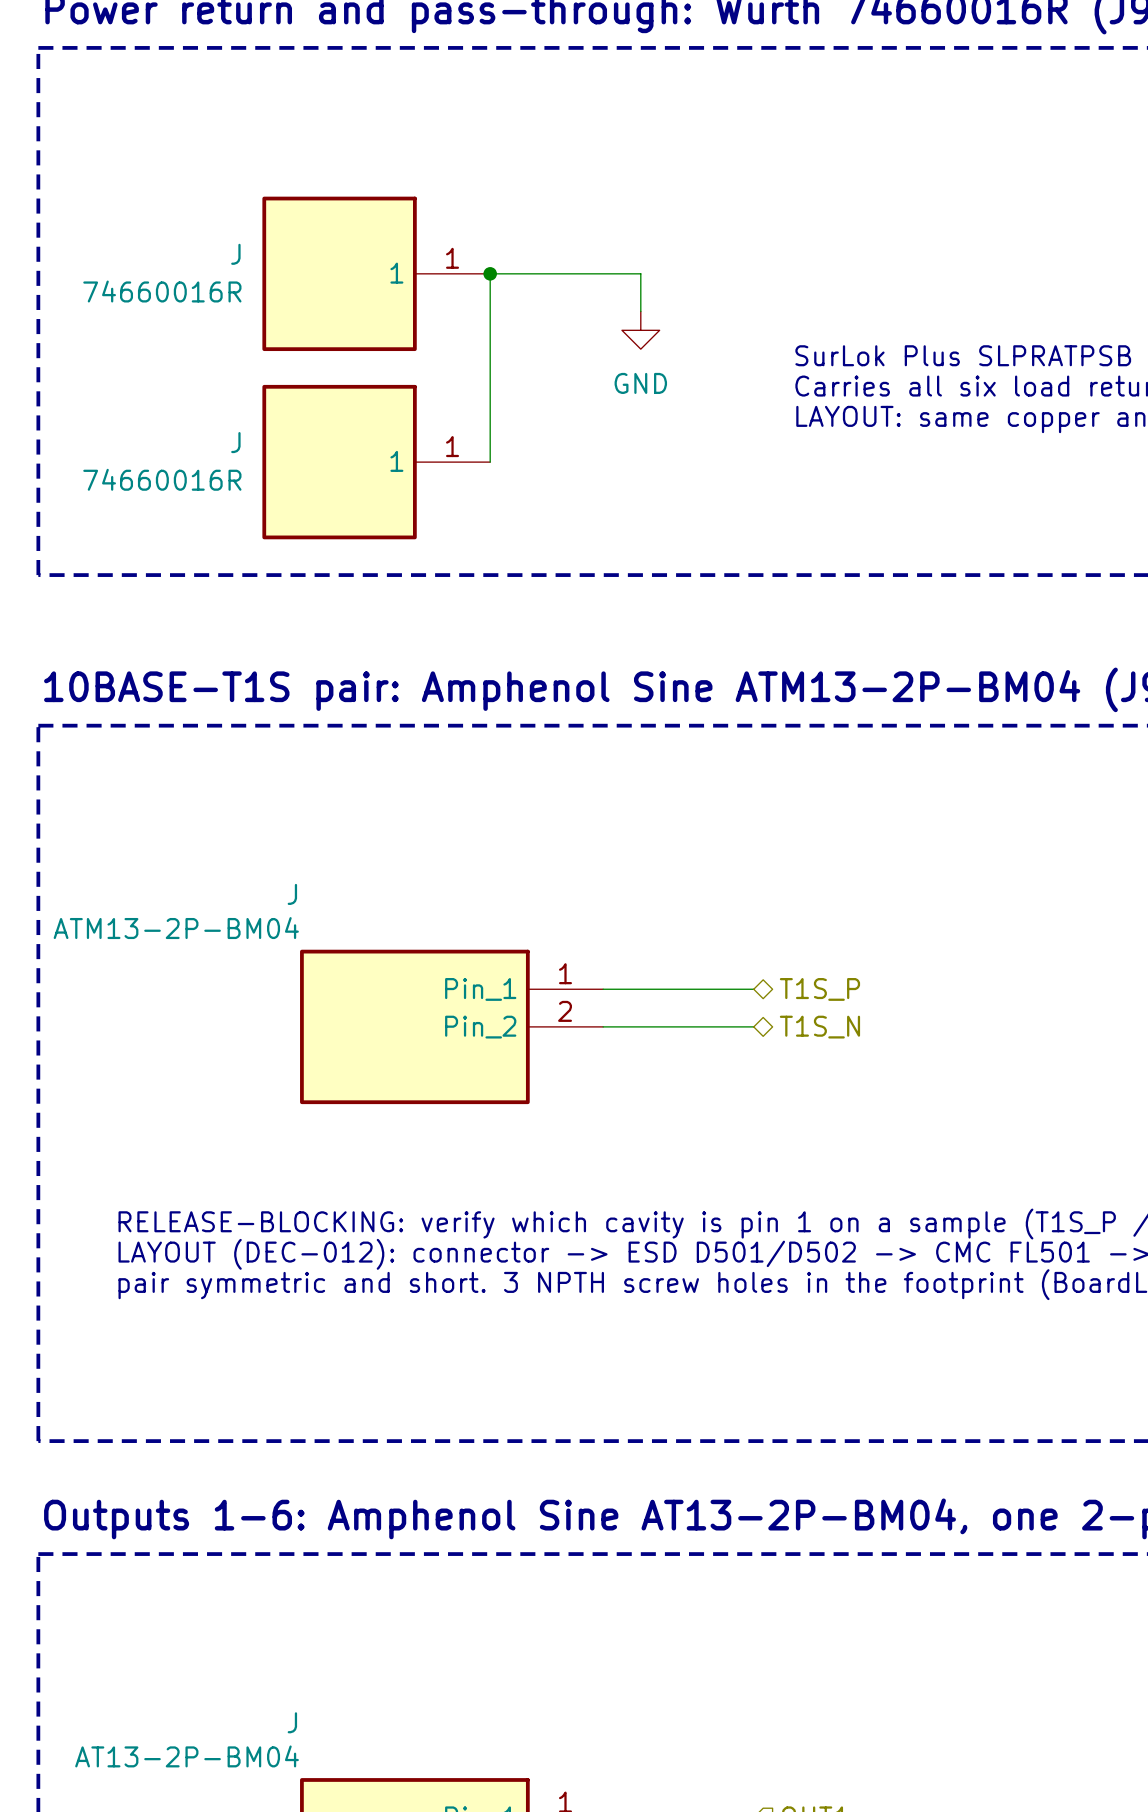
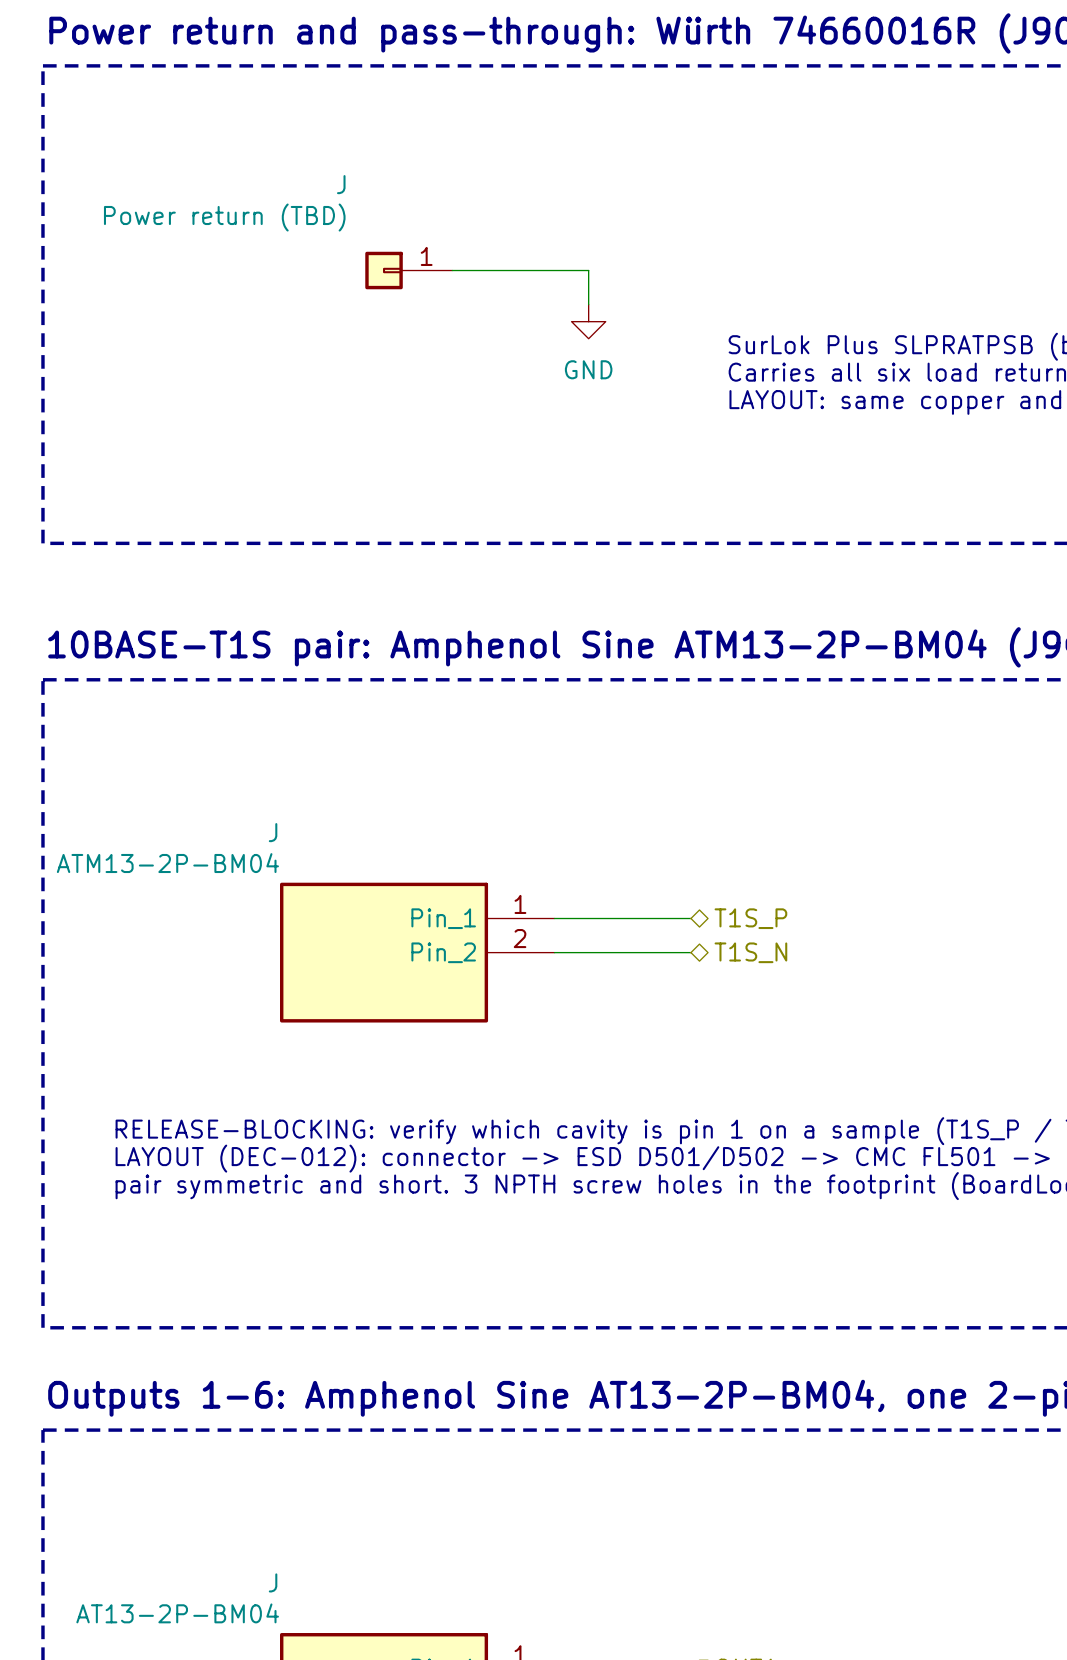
J: 74660016R (376, 273) -> none
J: none -> Power return (TBD) (408, 270)
wire: (490, 273) (490, 462) -> none
junction: (490, 273) -> none
J: 74660016R (376, 462) -> none

